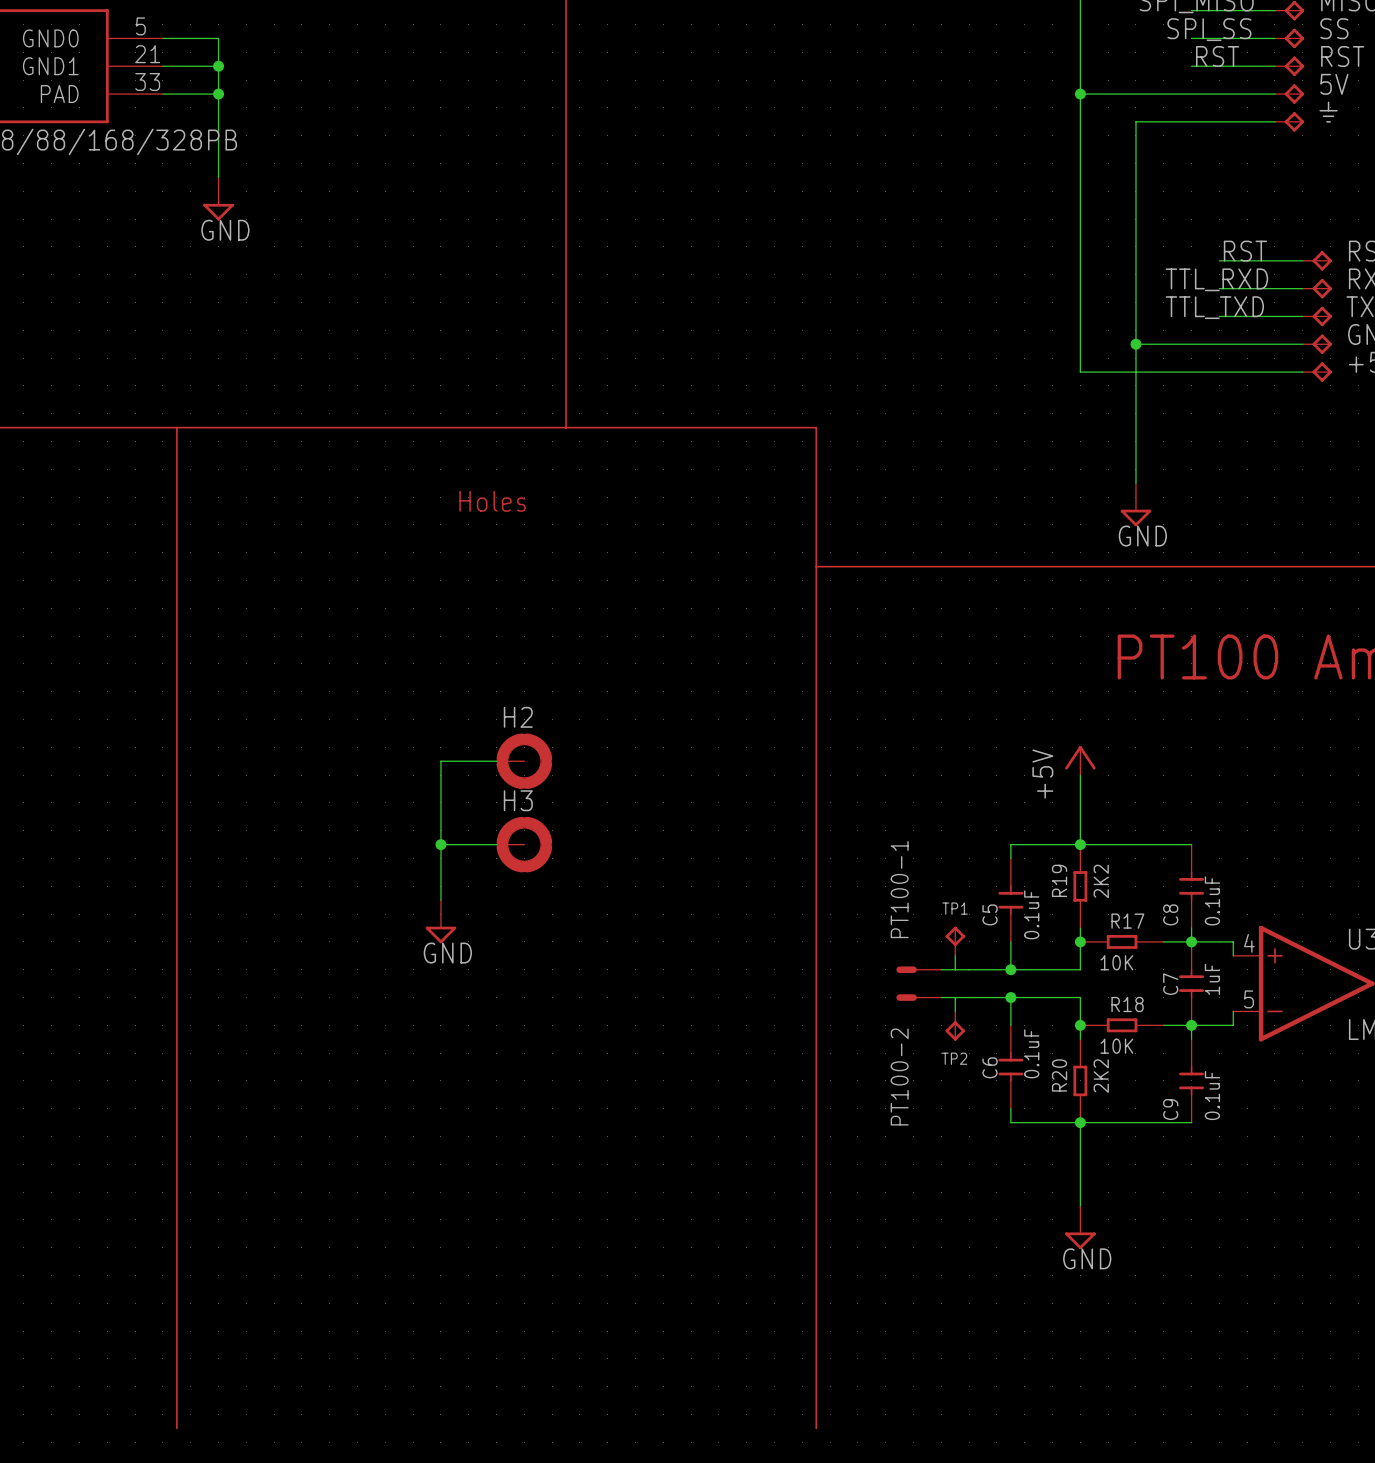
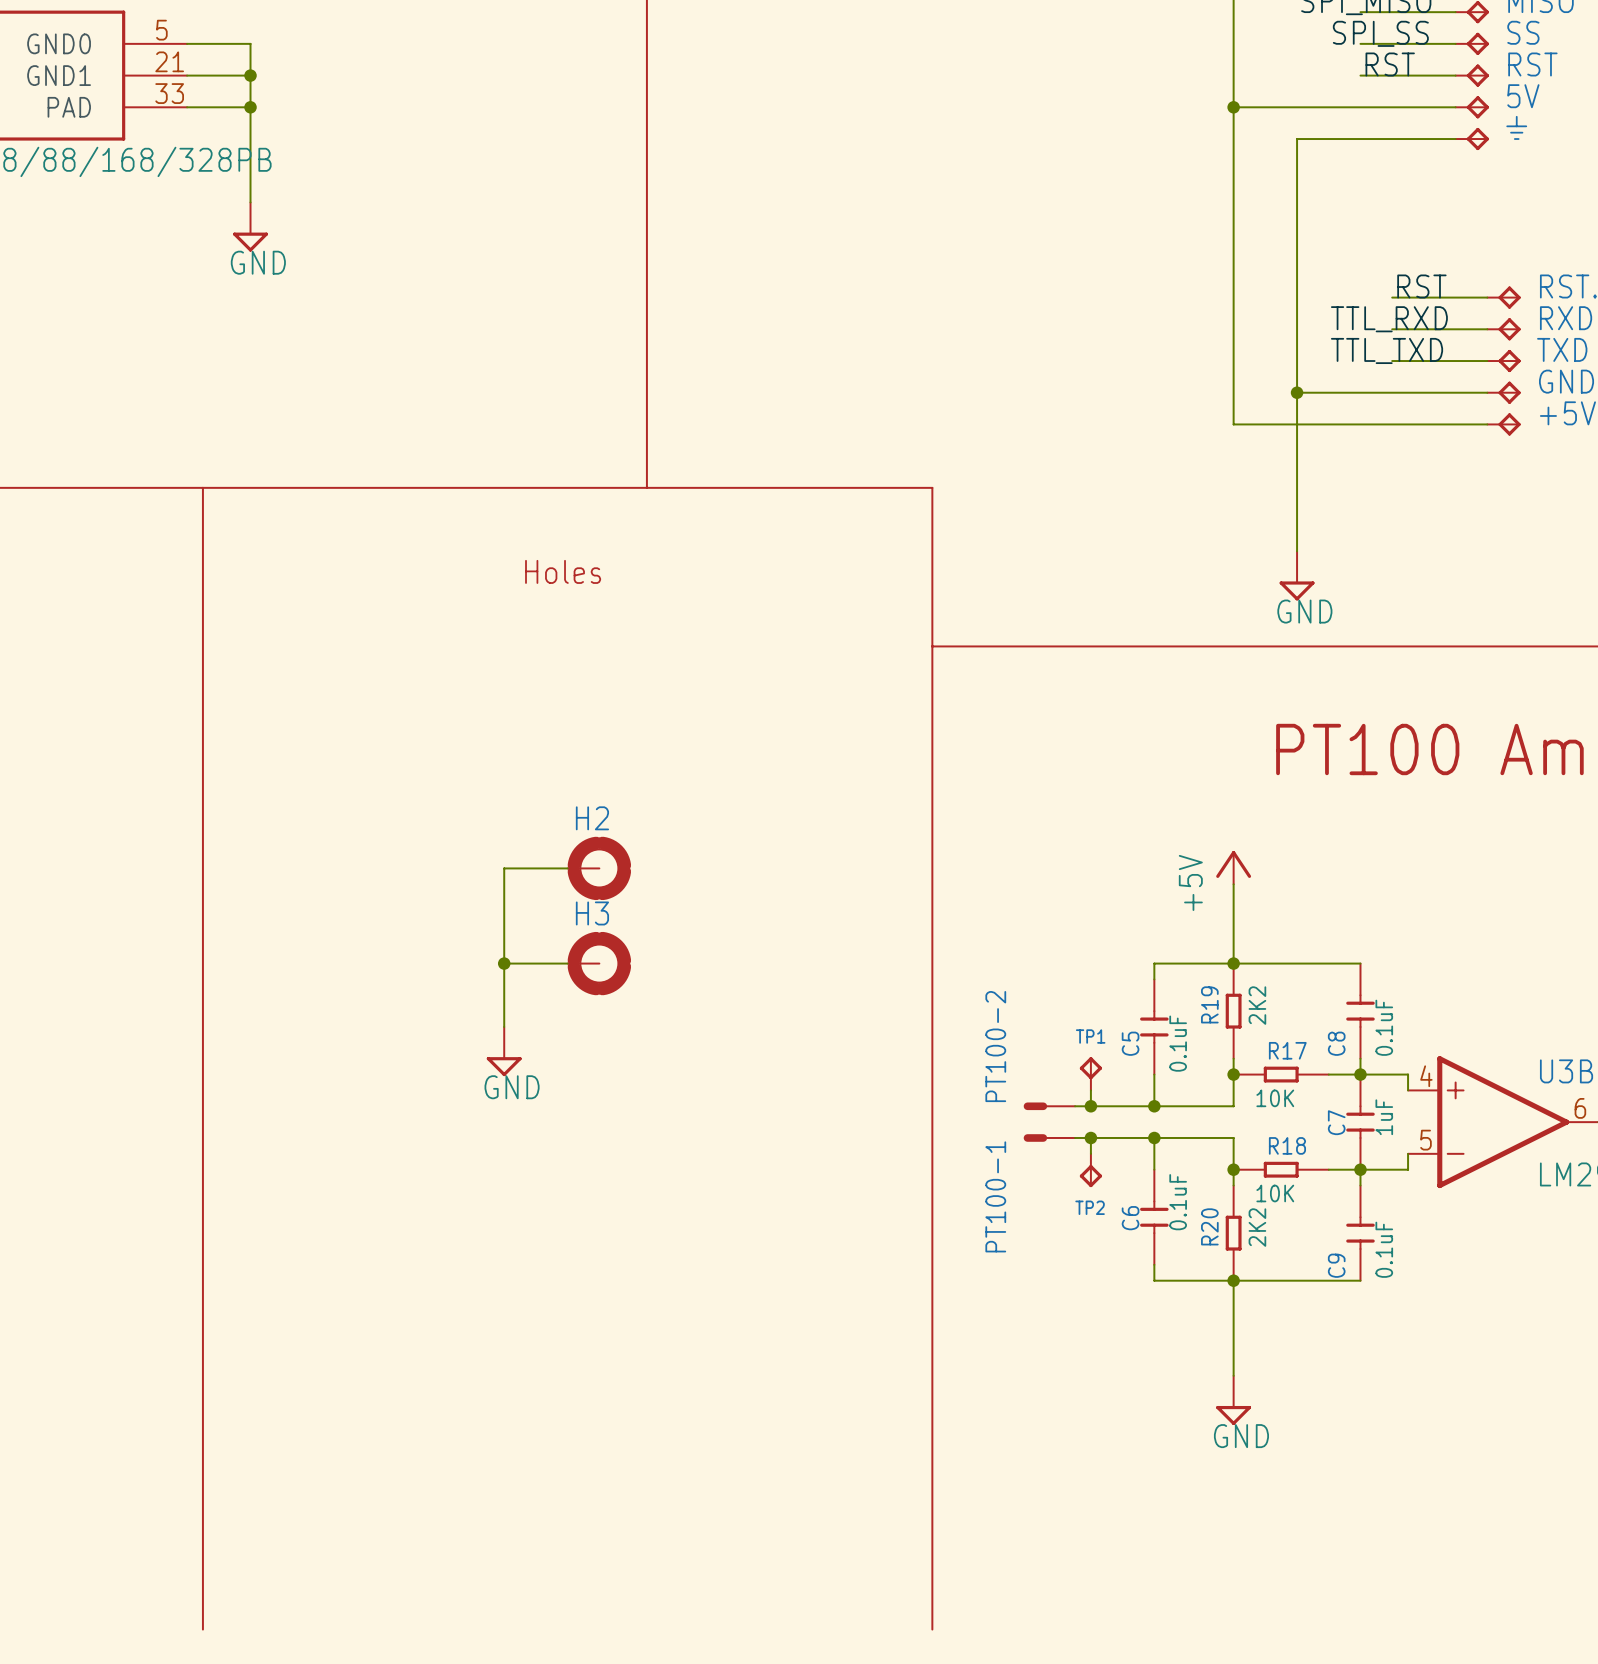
PT100-1 name: PT100-1 (899, 889) -> PT100-2 (995, 1046)
junction: none -> (1090, 1106)
junction: none -> (1090, 1137)
PT100-2 name: PT100-2 (899, 1076) -> PT100-1 (995, 1196)

